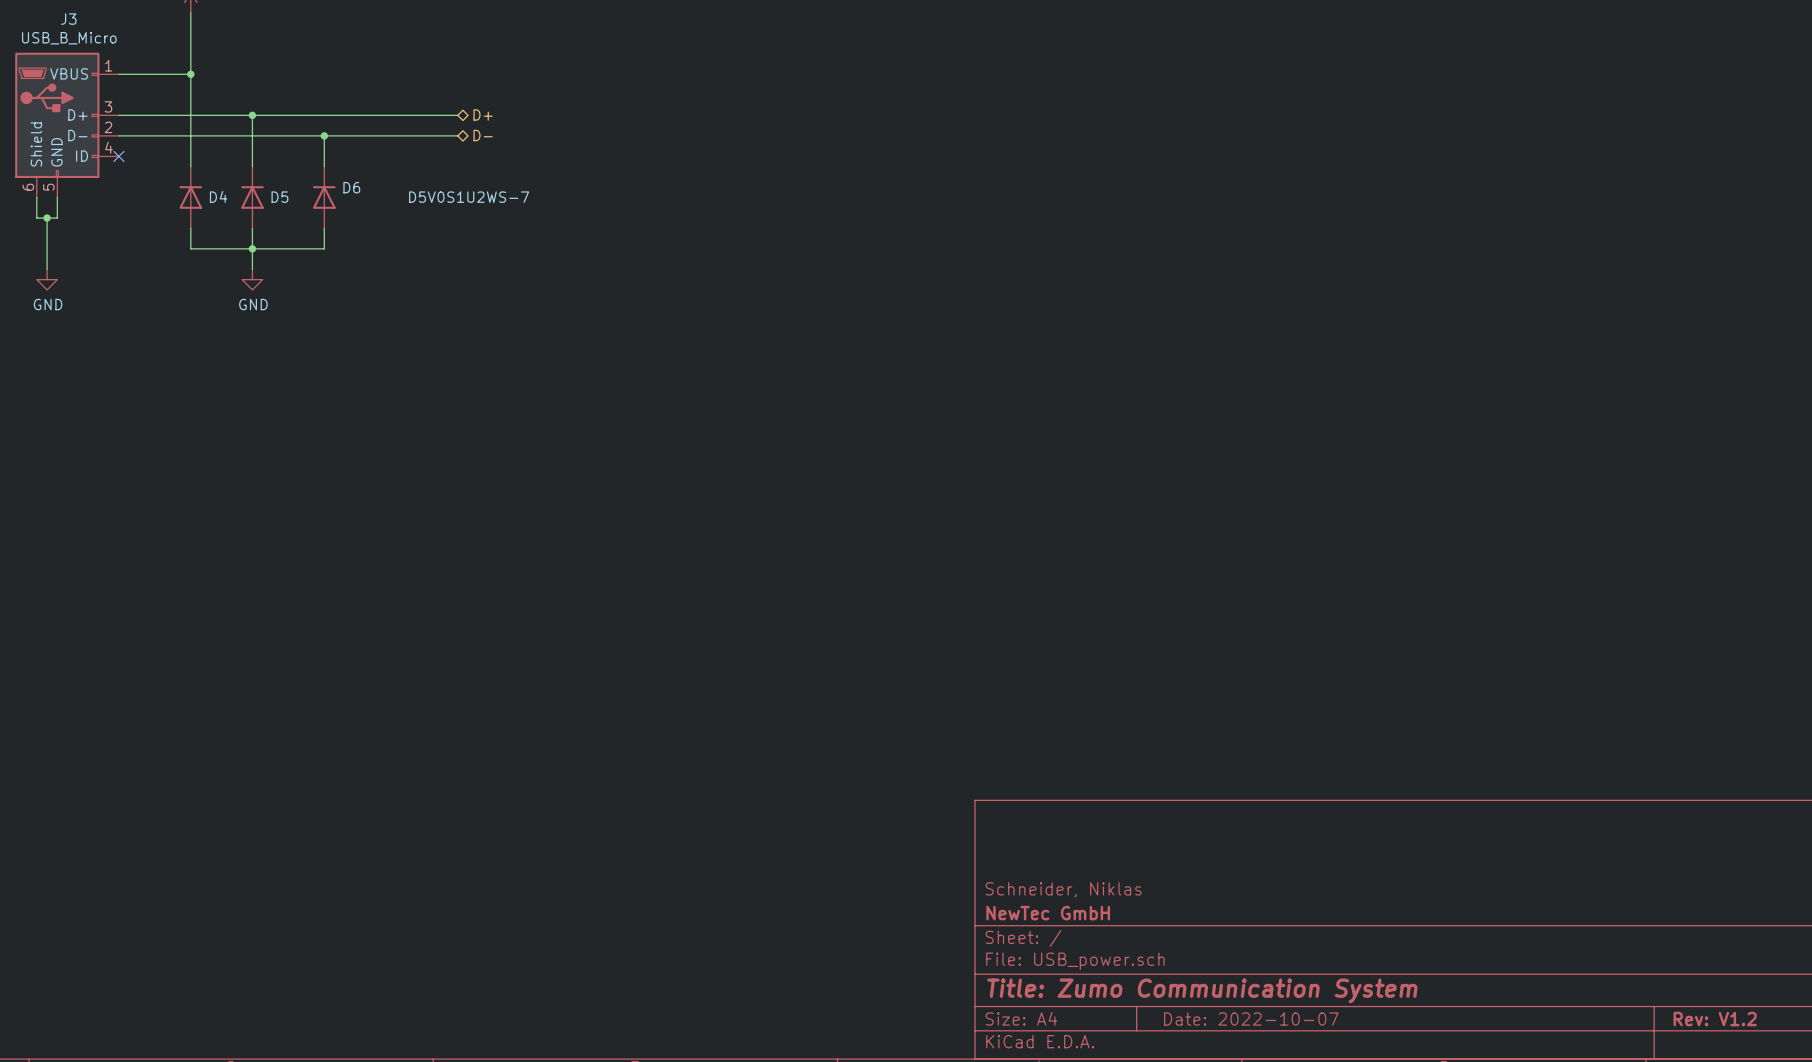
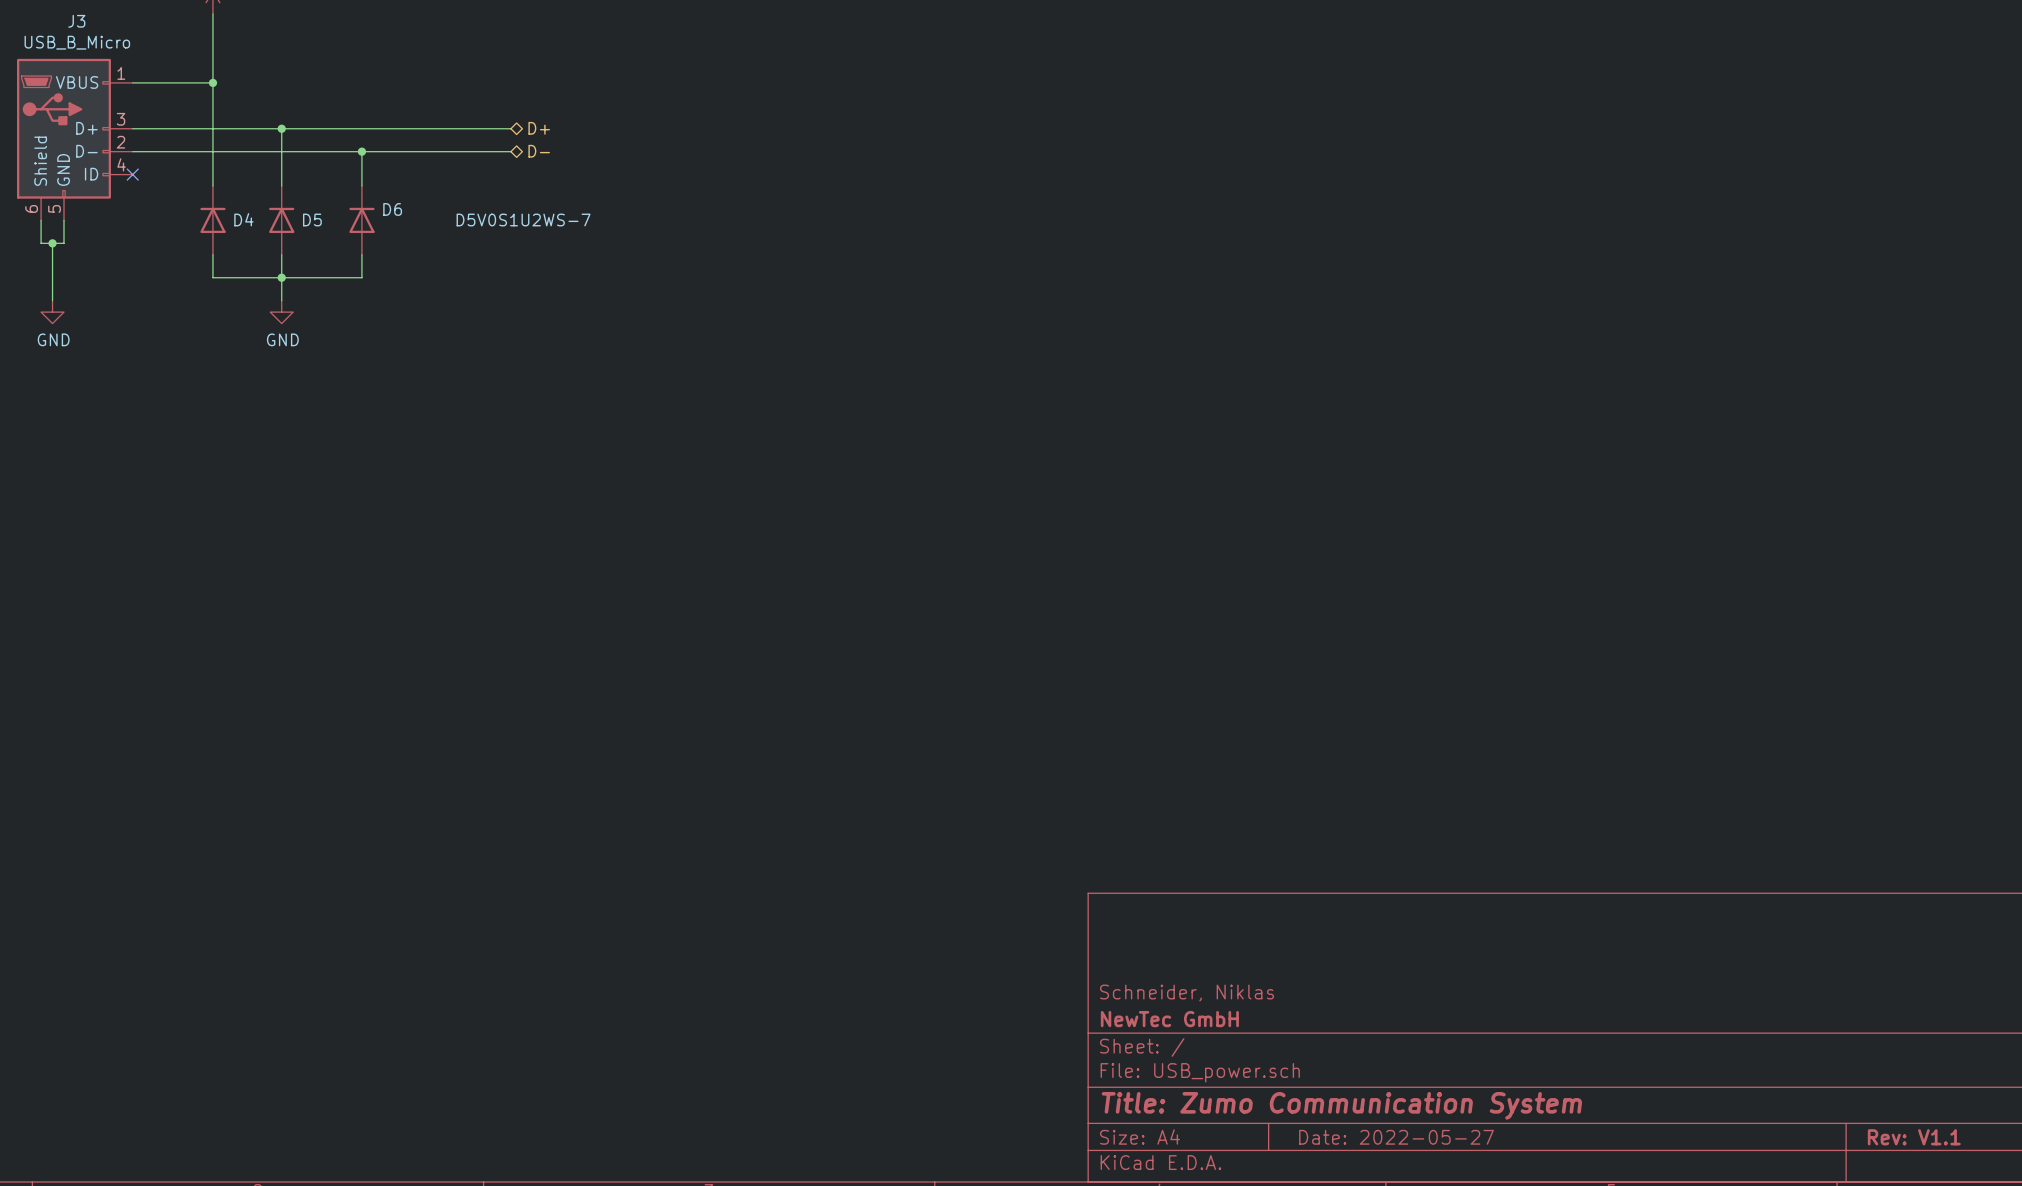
title block: Date: 2022-10-07 (1251, 1019) -> Date: 2022-05-27 (1396, 1137)
title block: Rev: V1.2 (1715, 1019) -> Rev: V1.1 (1914, 1137)

